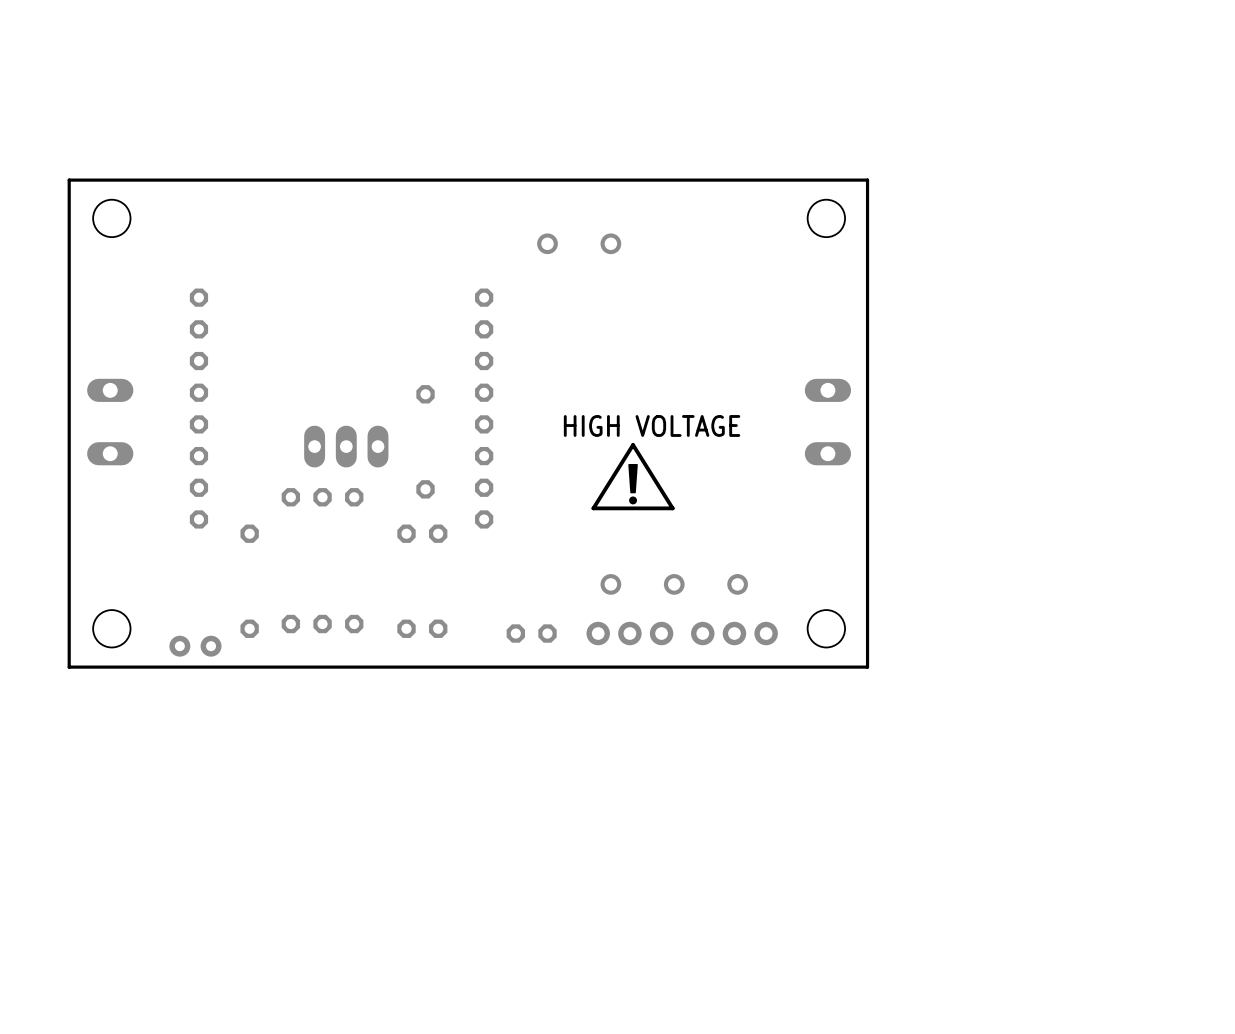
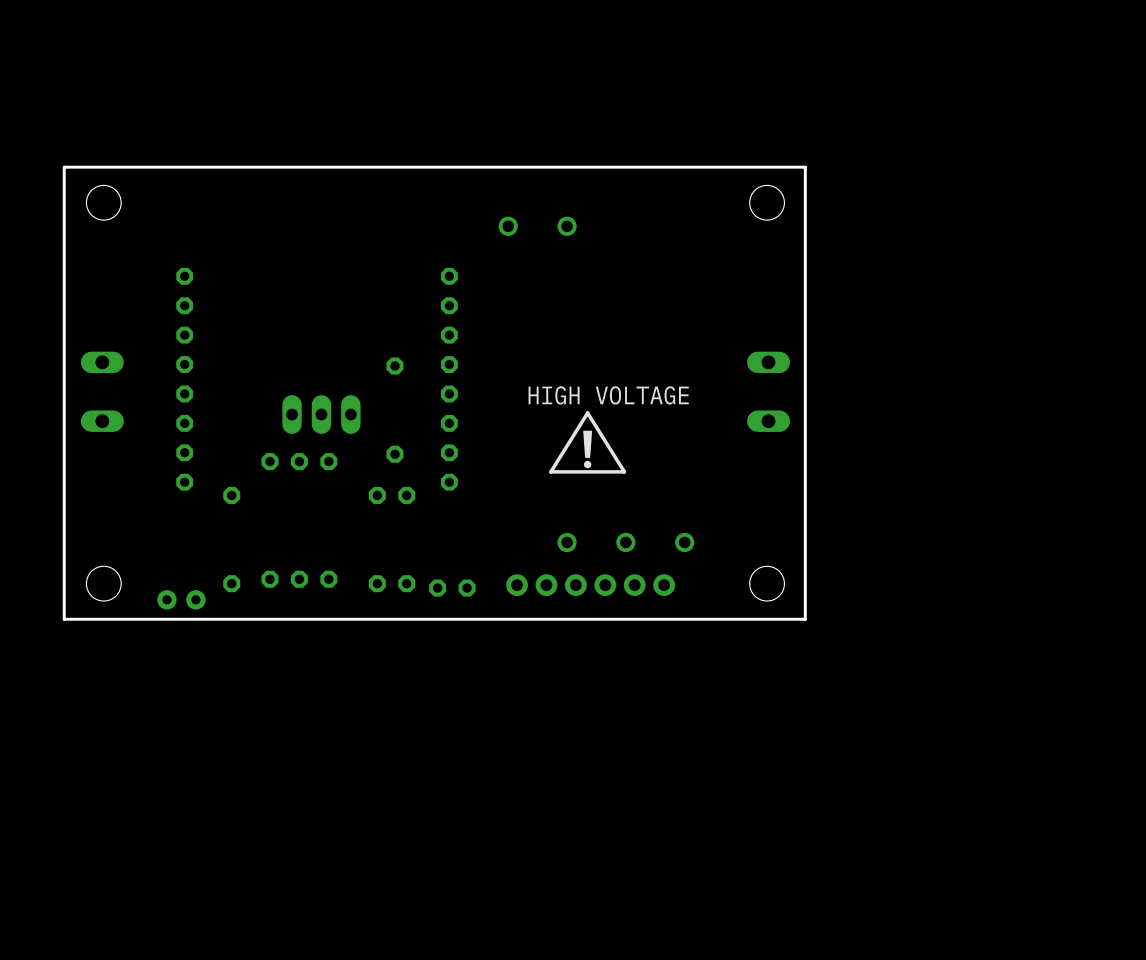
part: none -> (546, 585)
part: none -> (634, 585)
part position: (531, 633) -> (452, 588)
part: (629, 633) -> none
part: (734, 633) -> none

